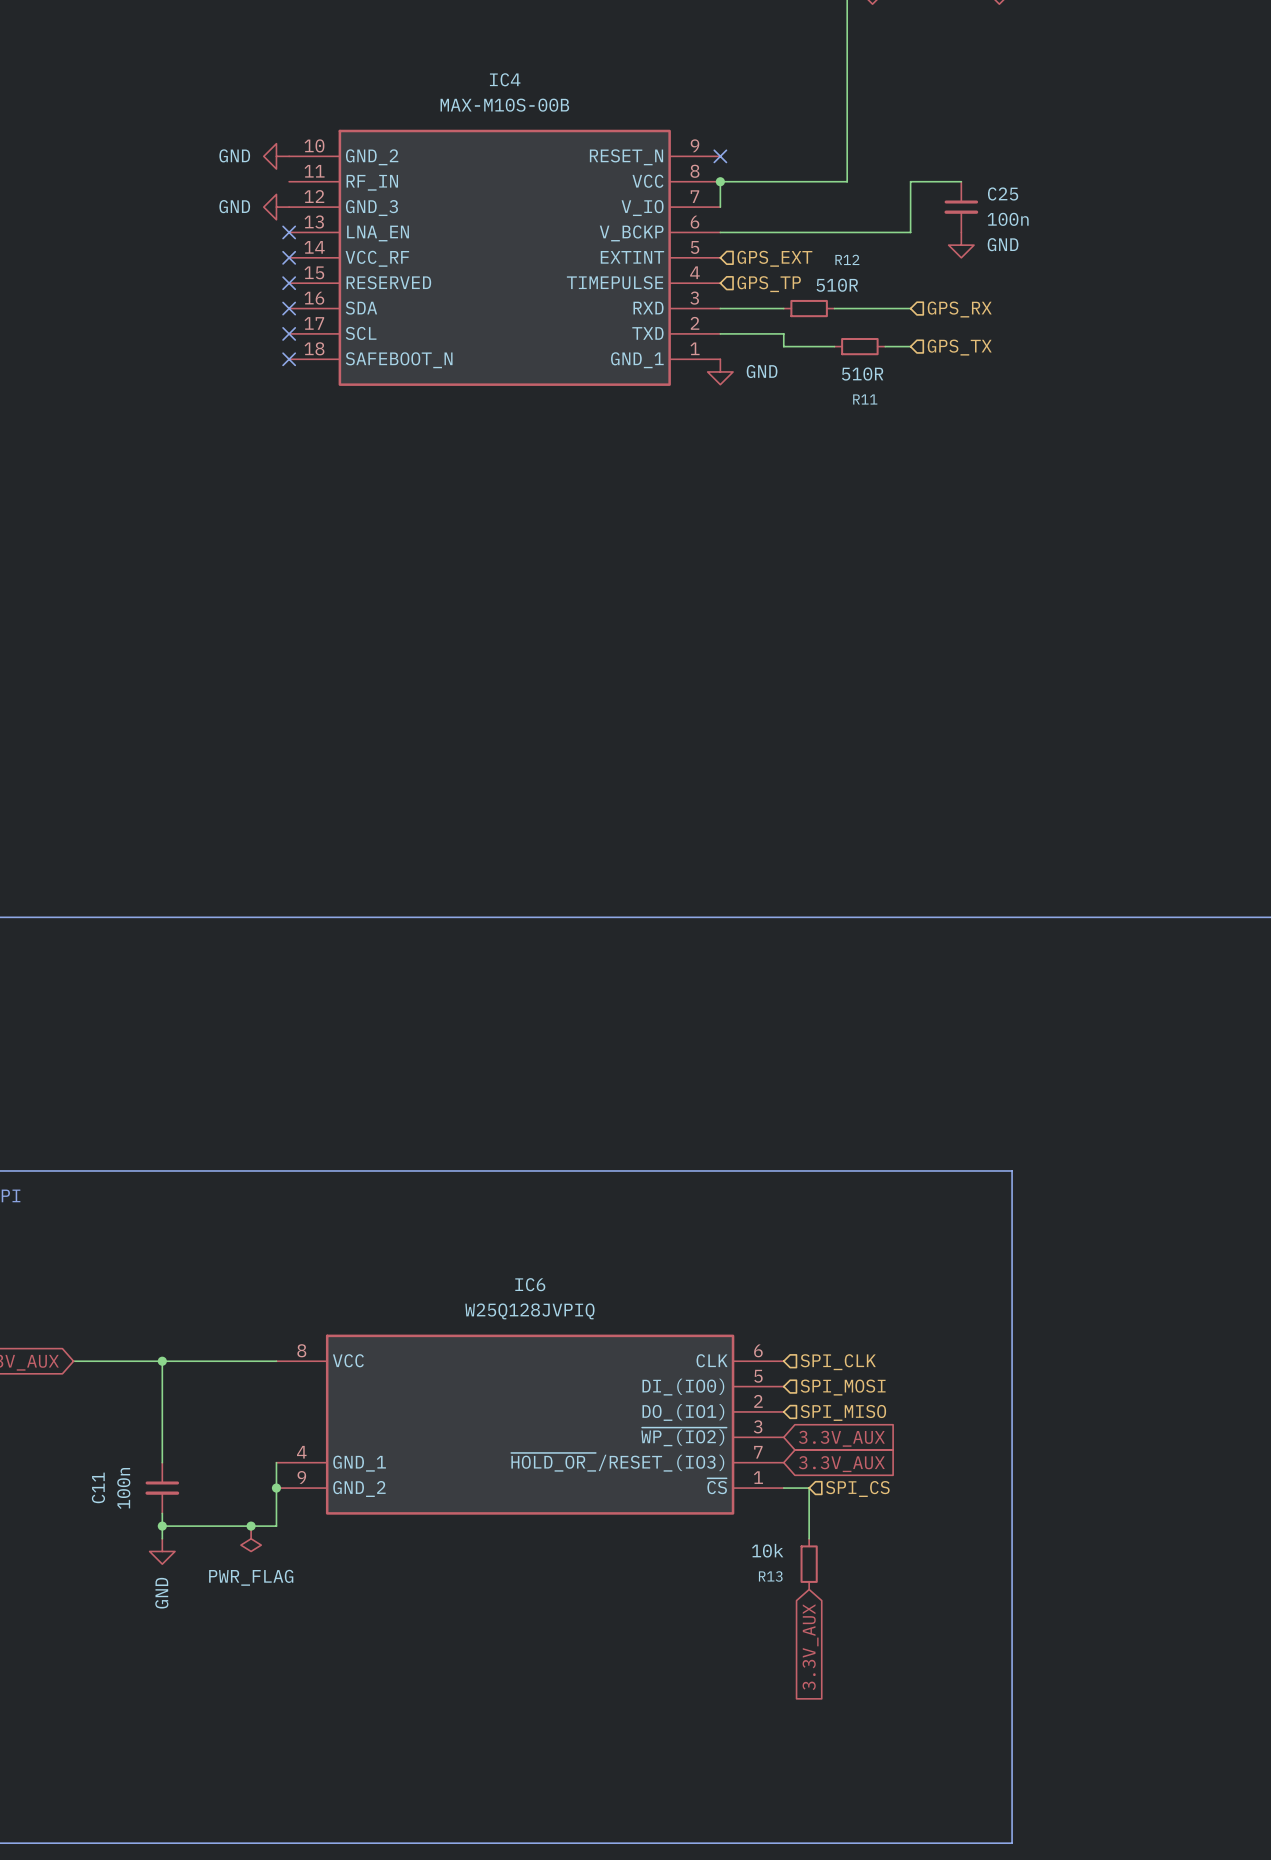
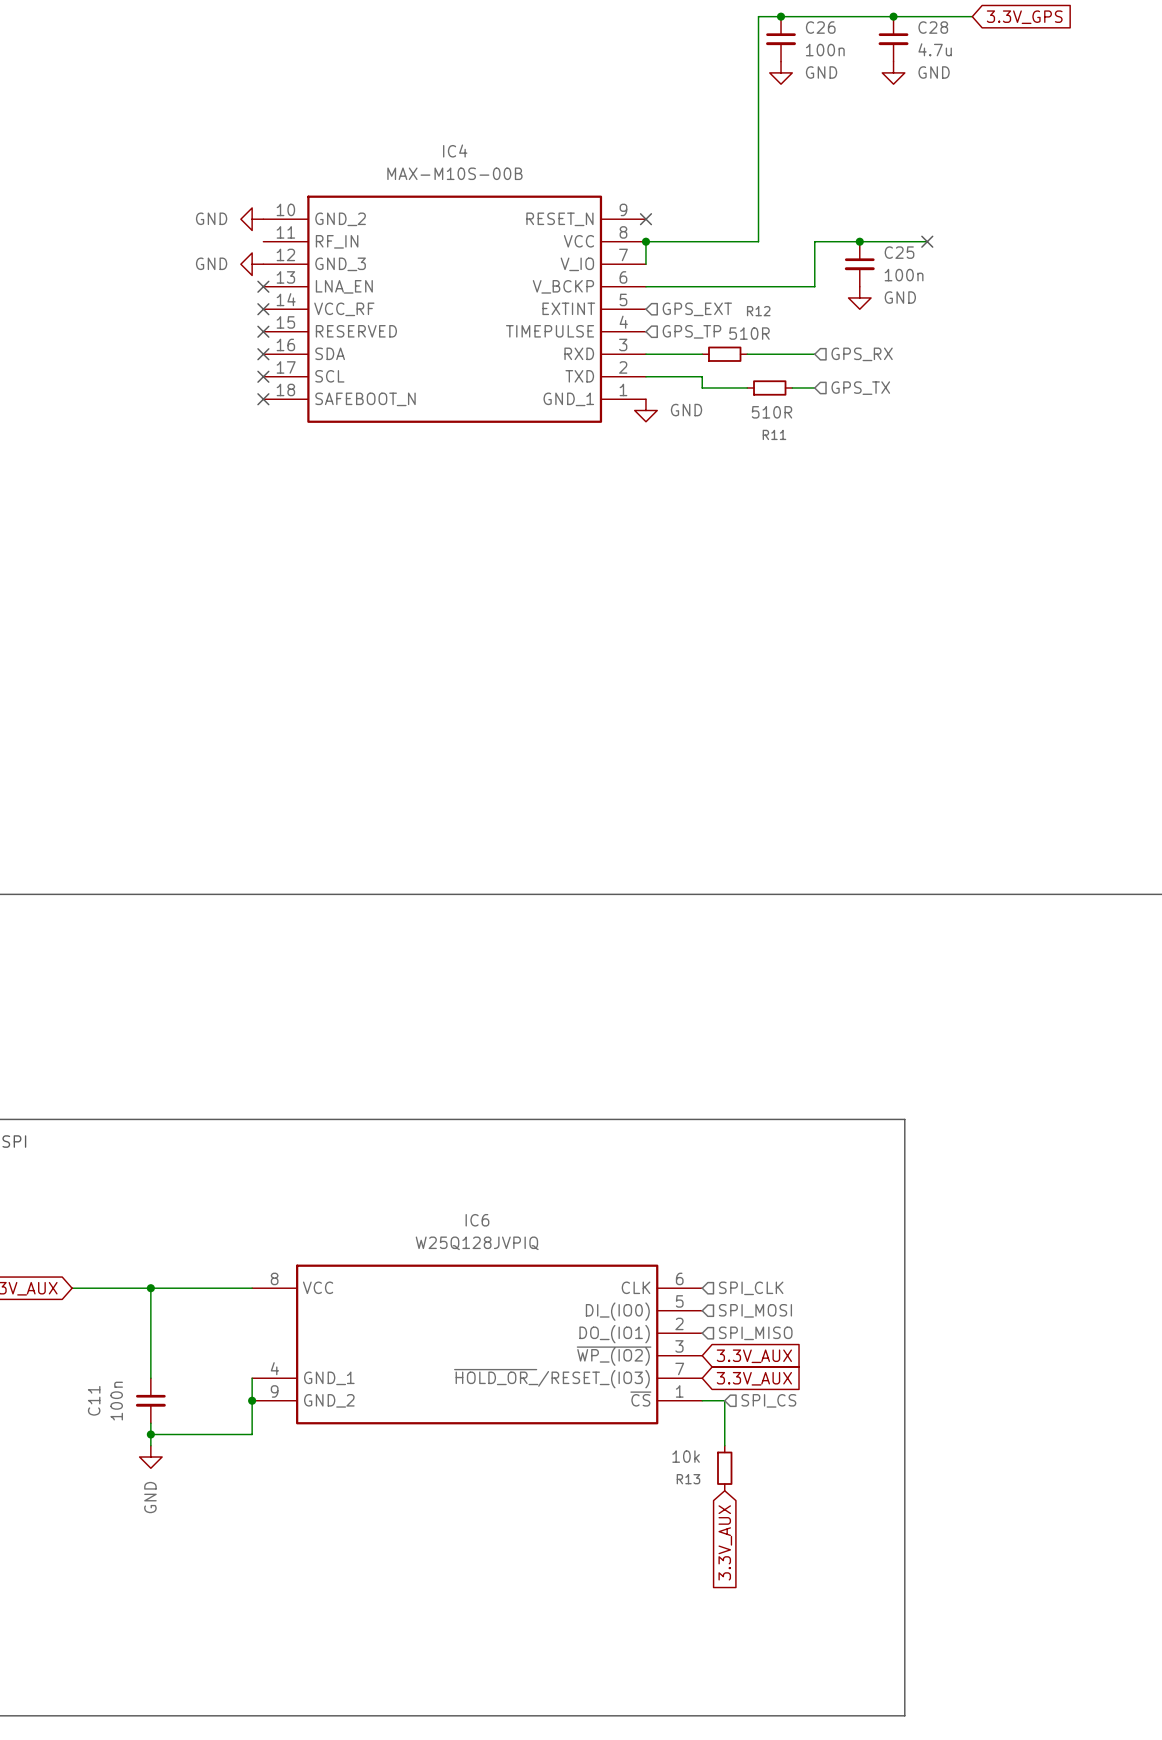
wire: none -> (859, 241) (927, 241)
junction: none -> (859, 241)
no-connect mark: none -> (927, 241)
junction: (251, 1526) -> none
power symbol: PWR_FLAG (251, 1538) -> none

